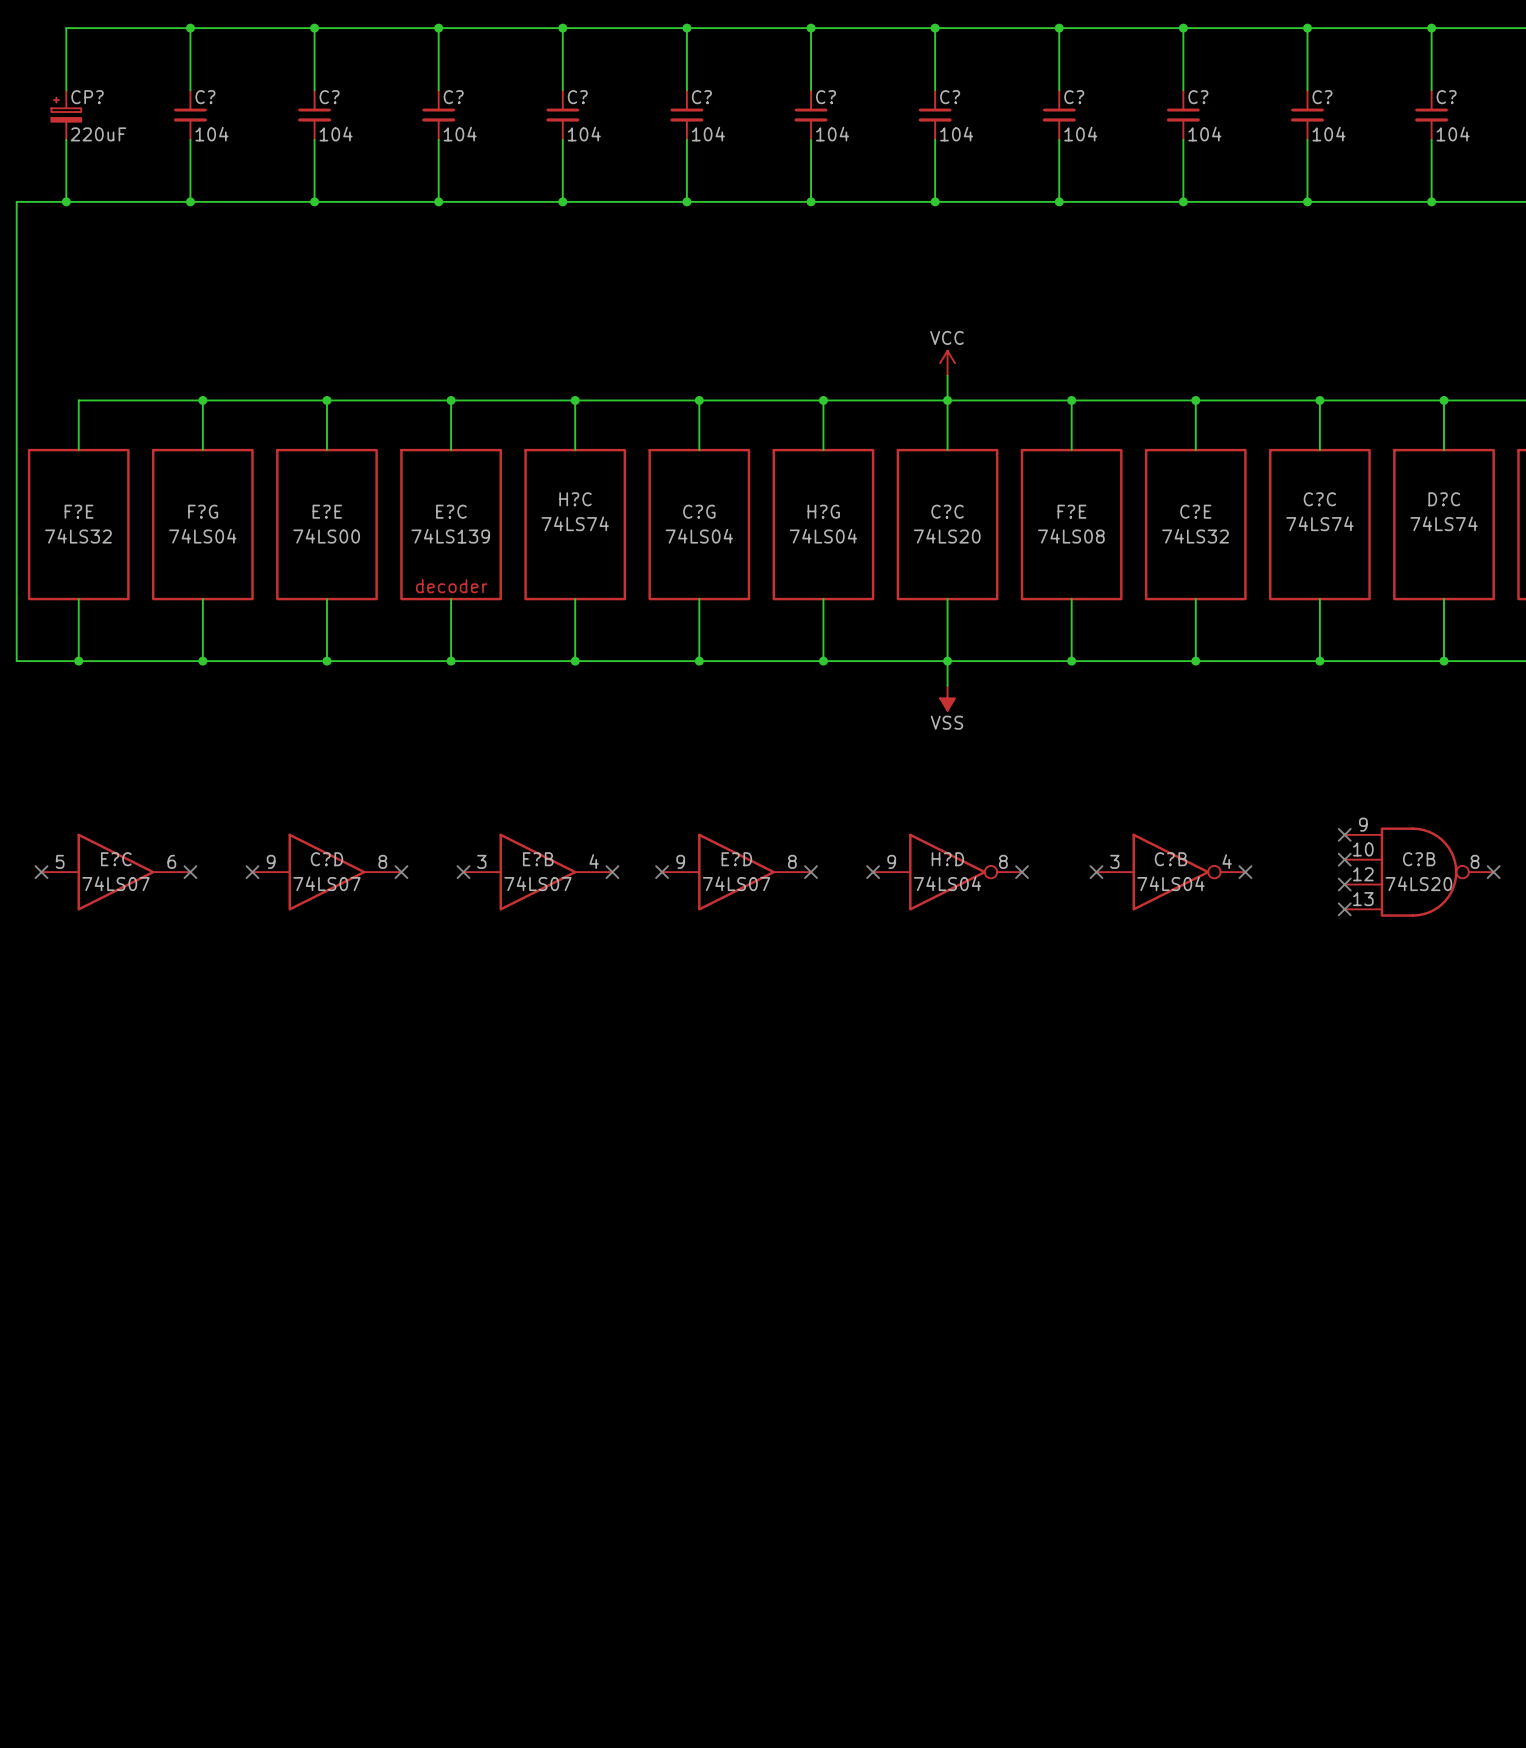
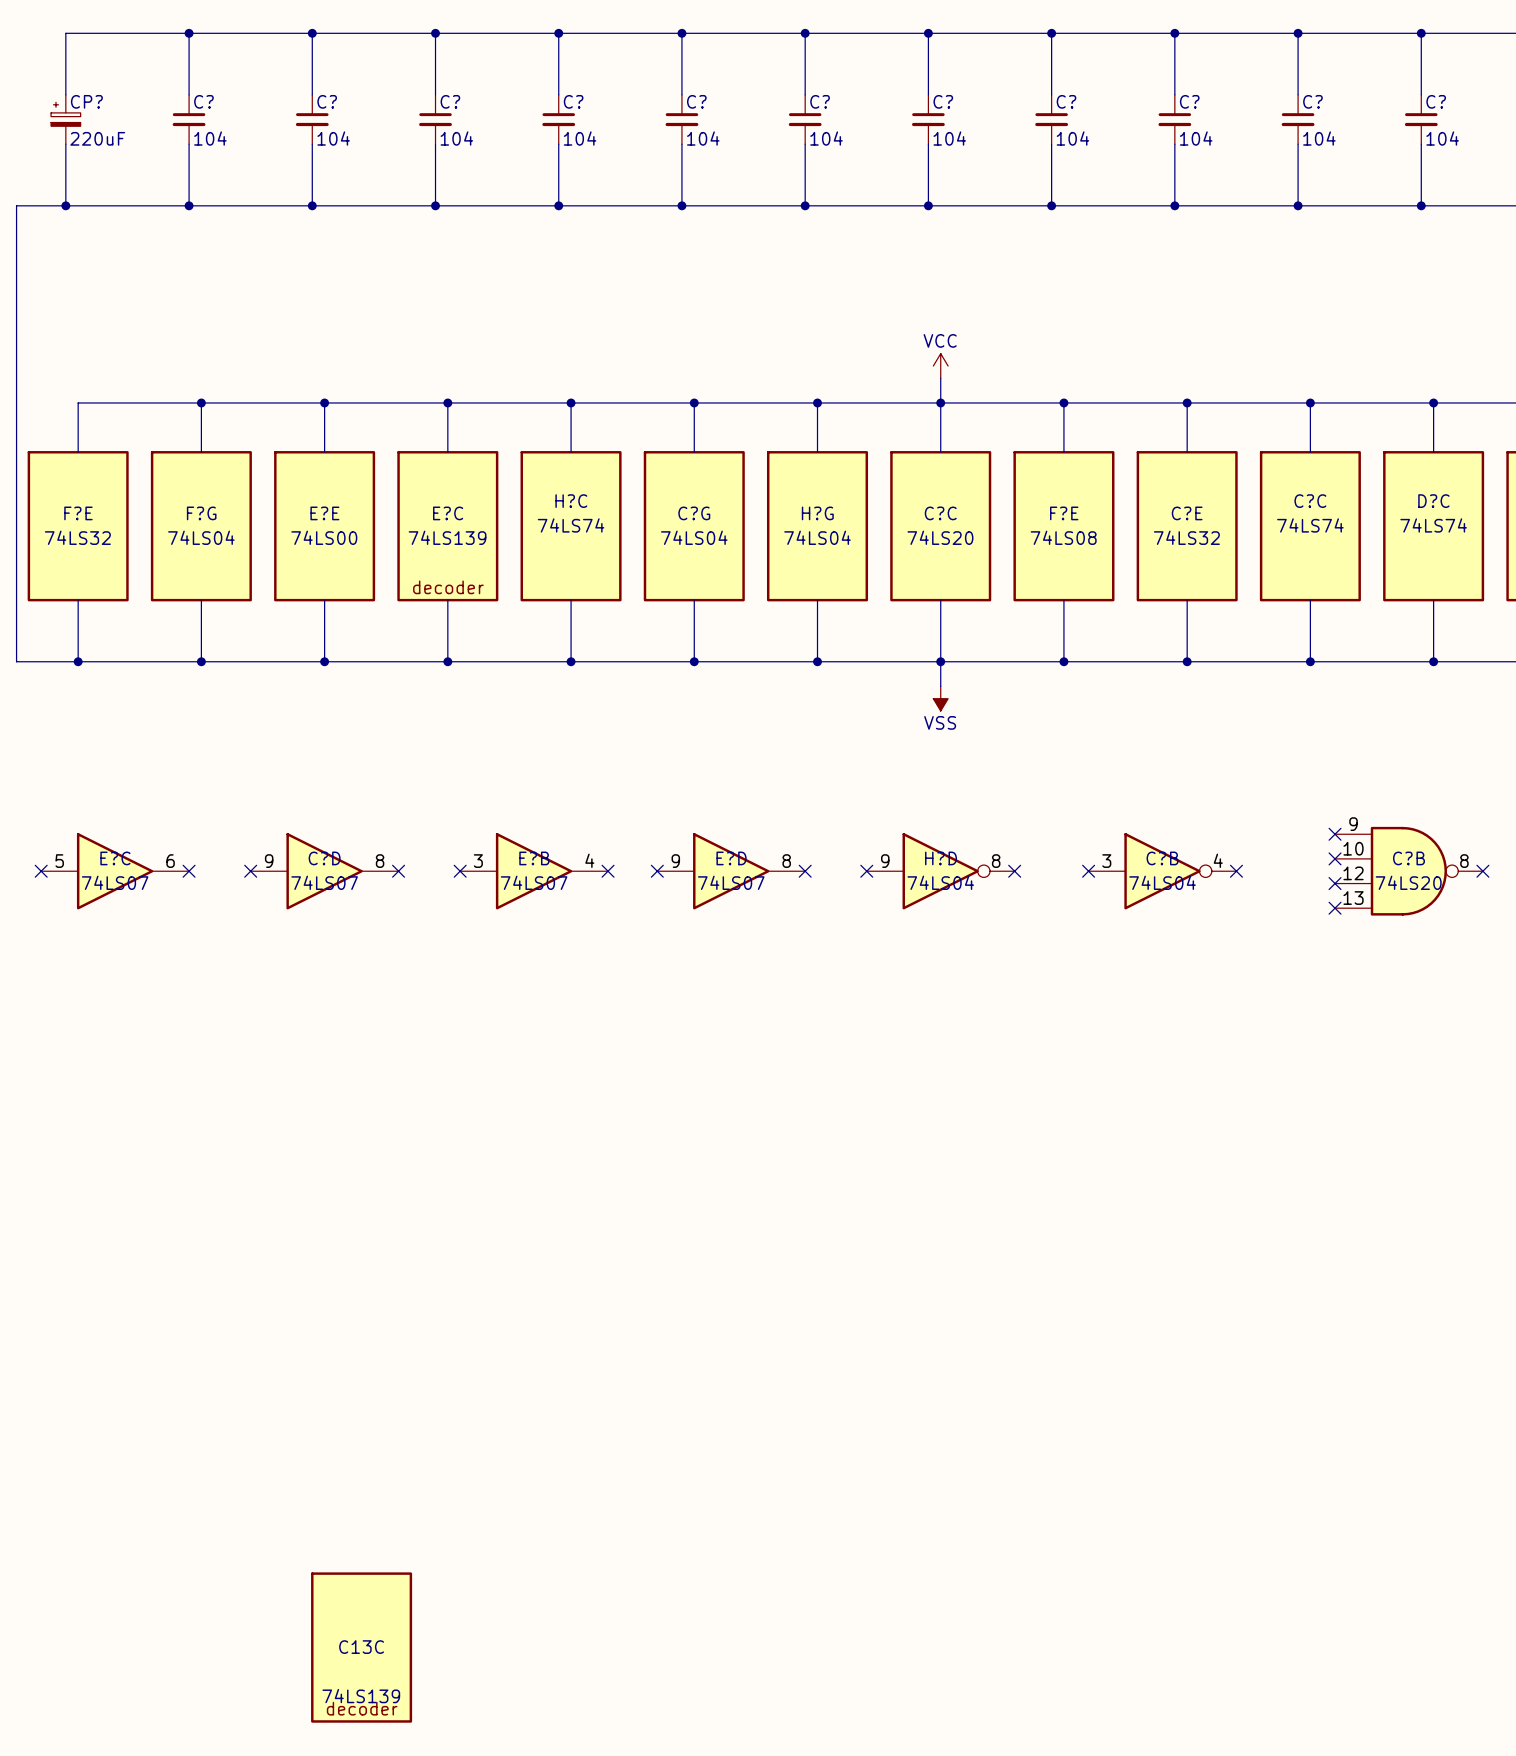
C13C: none -> 74LS139 (361, 1647)

